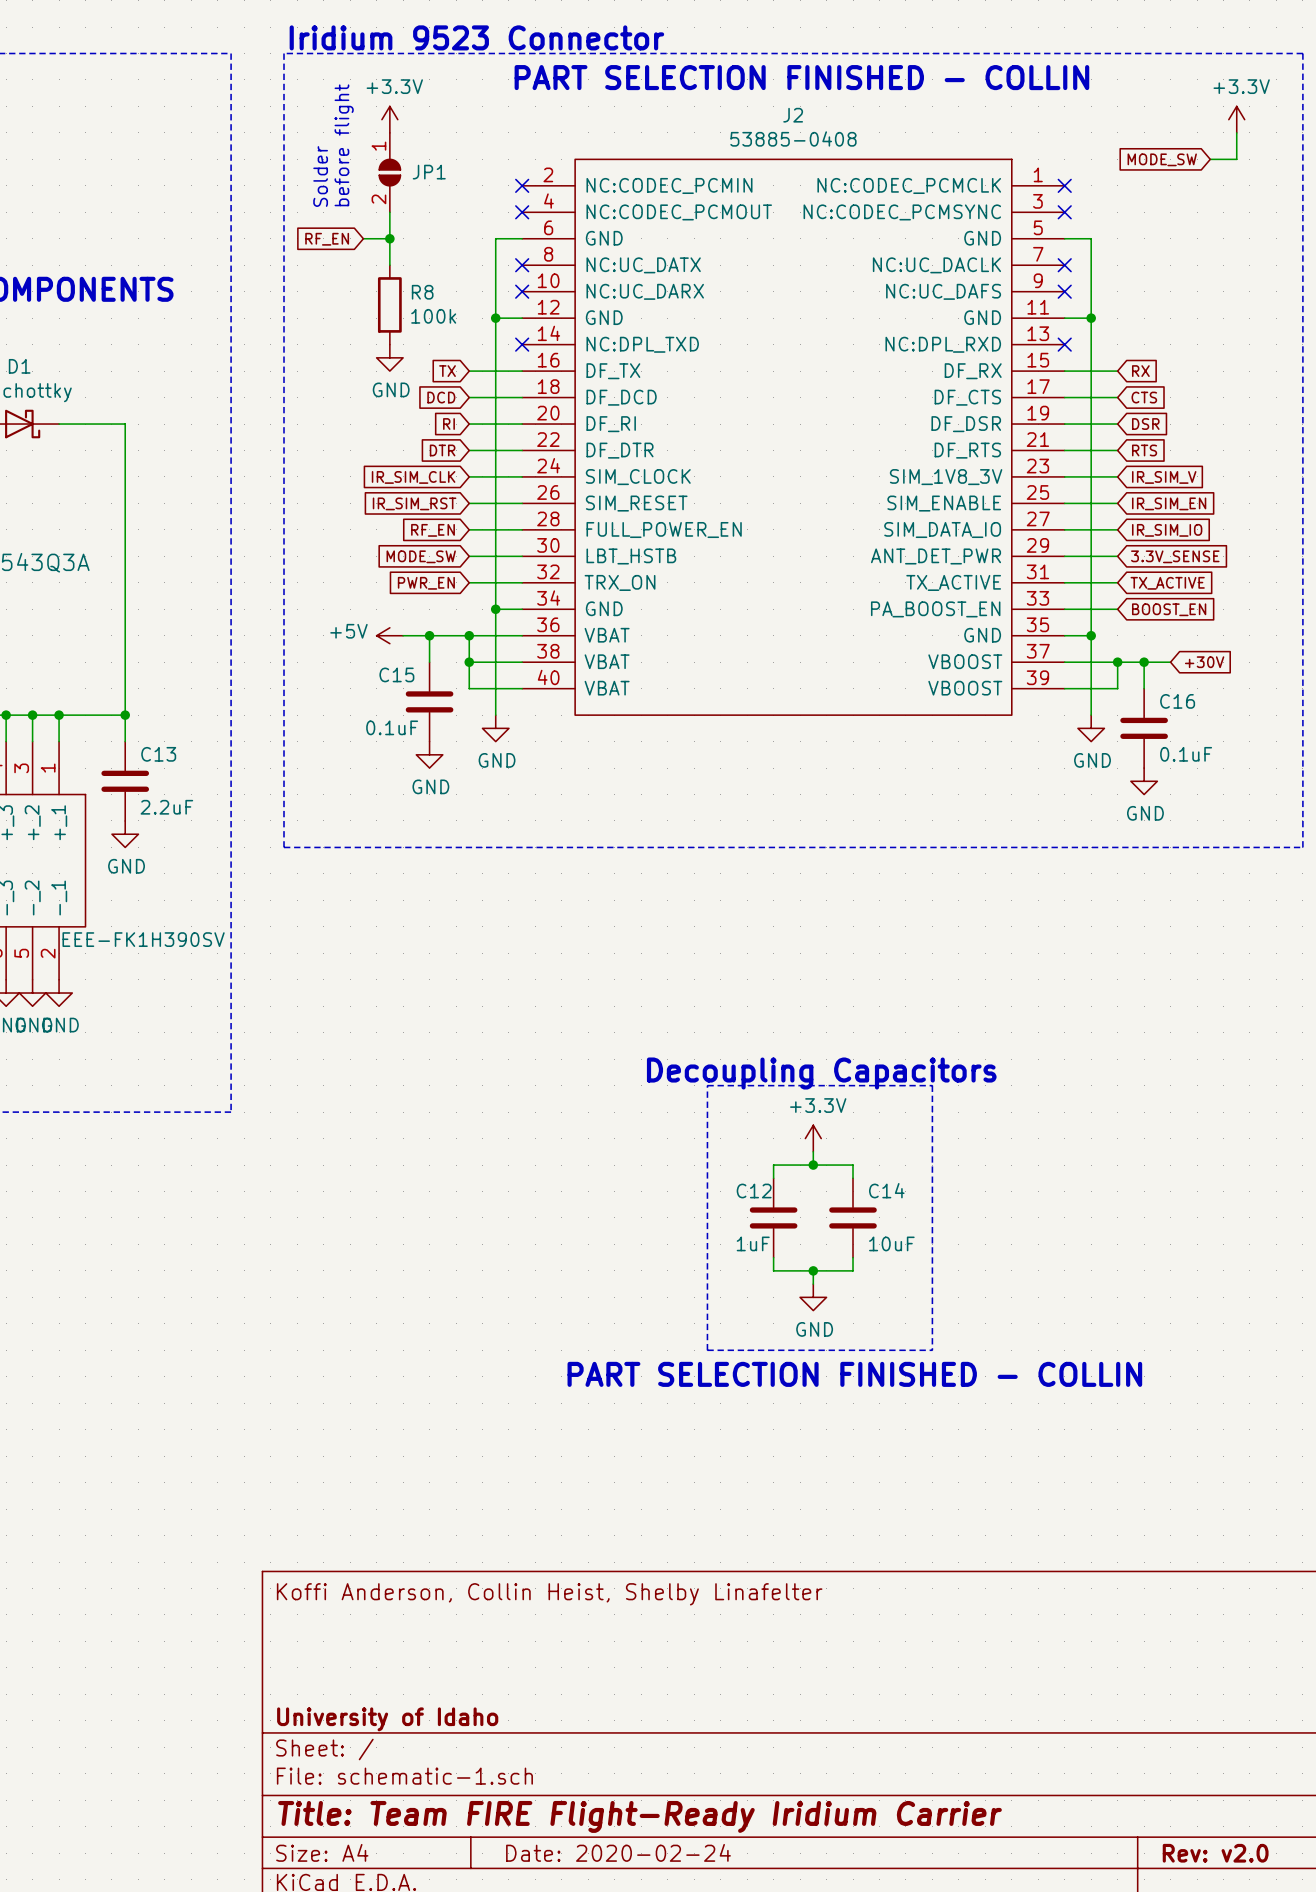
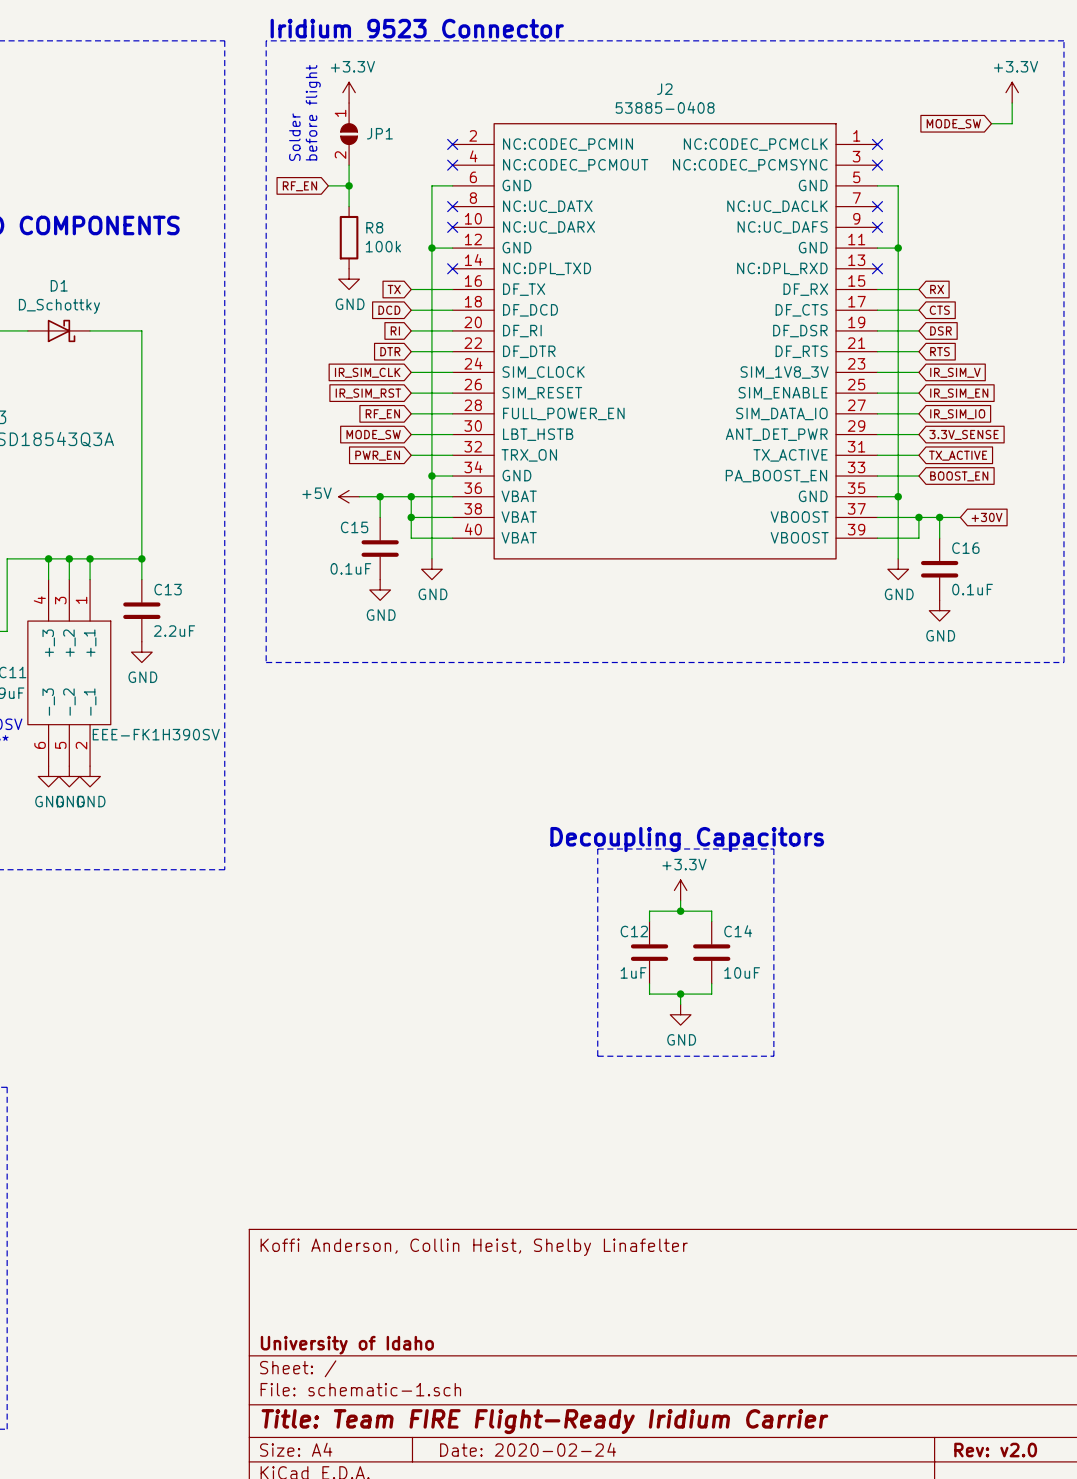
text: PART SELECTION FINISHED - COLLIN (801, 77) -> none
text: PART SELECTION FINISHED - COLLIN (854, 1374) -> none

